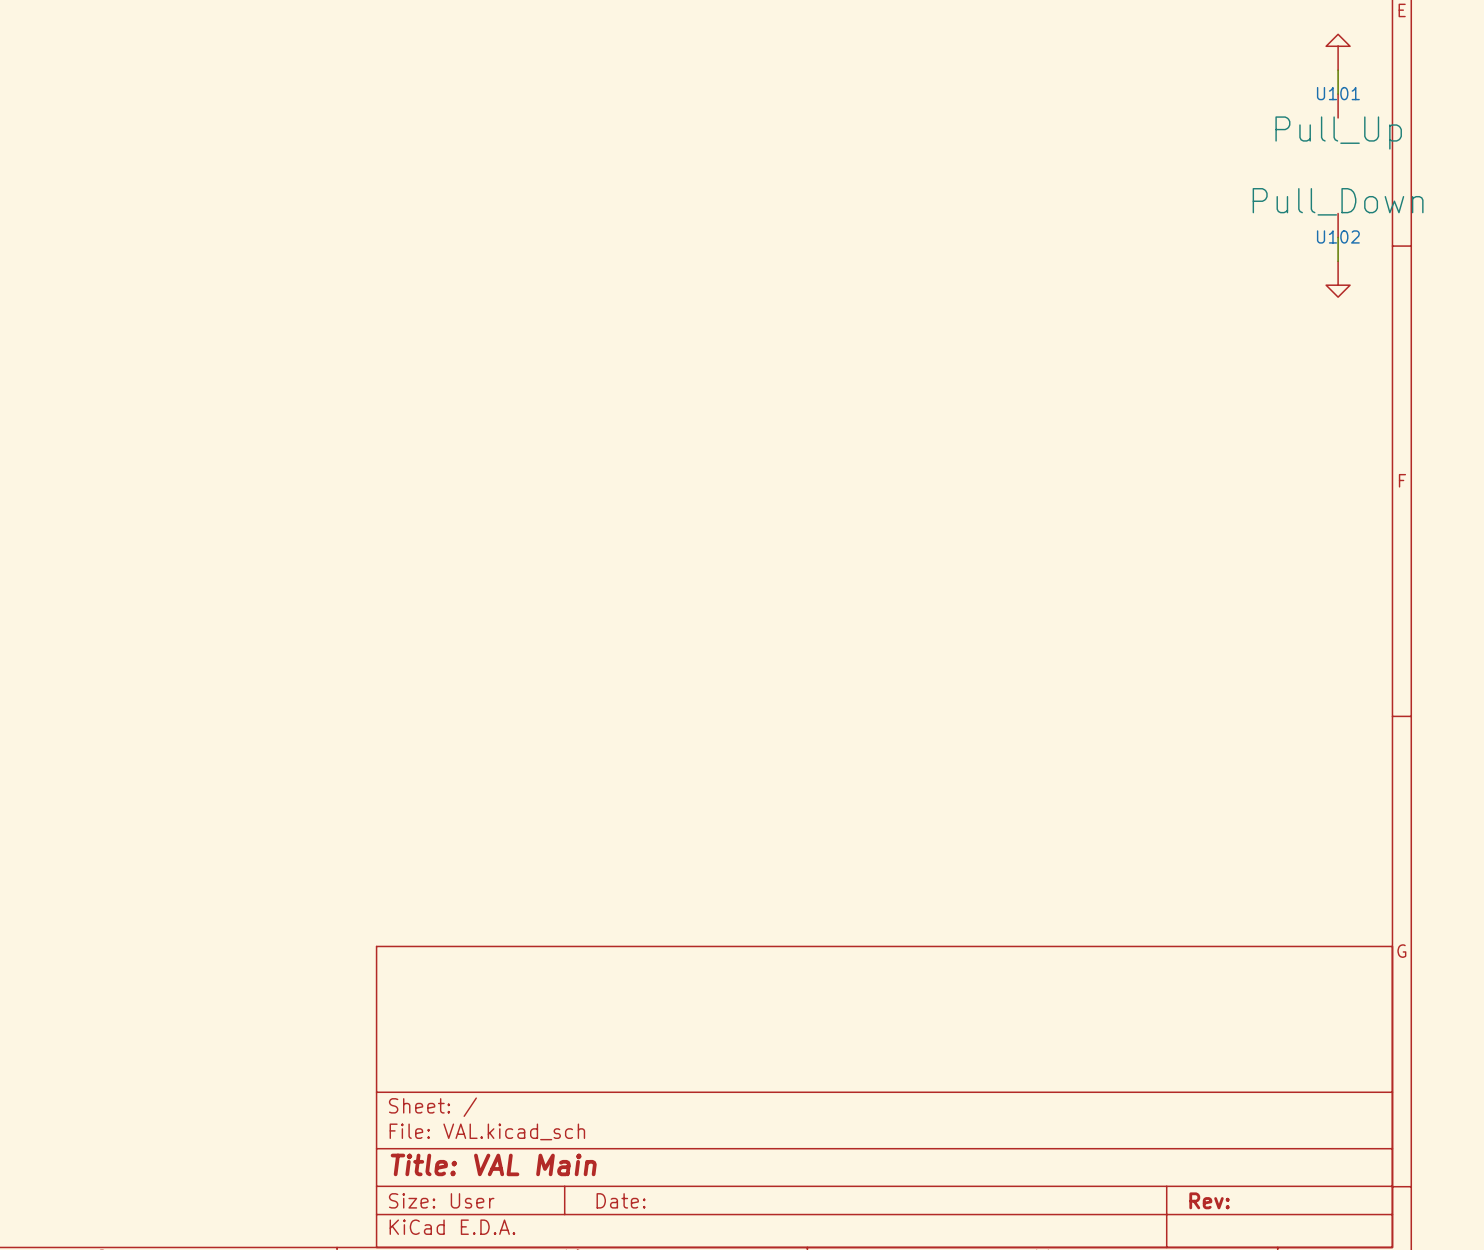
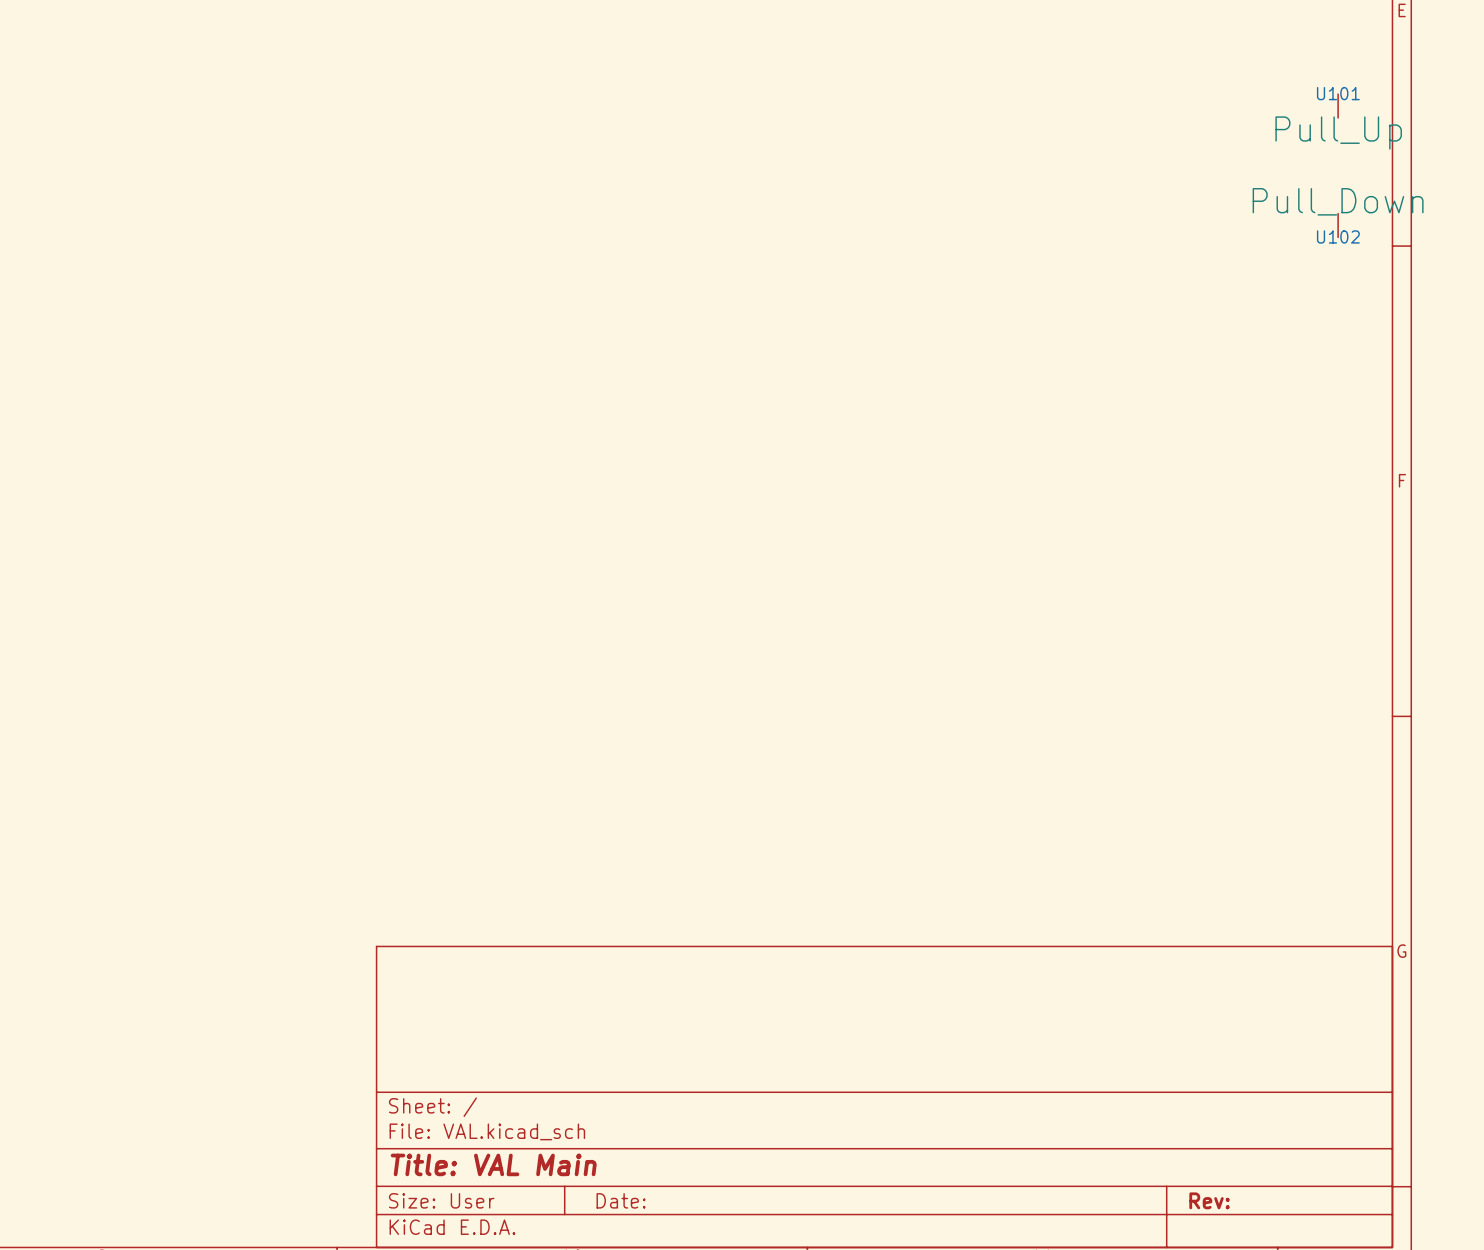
power symbol: (1338, 51) -> none
wire: (1338, 70) (1338, 94) -> none
wire: (1338, 237) (1338, 261) -> none
power symbol: (1338, 279) -> none

